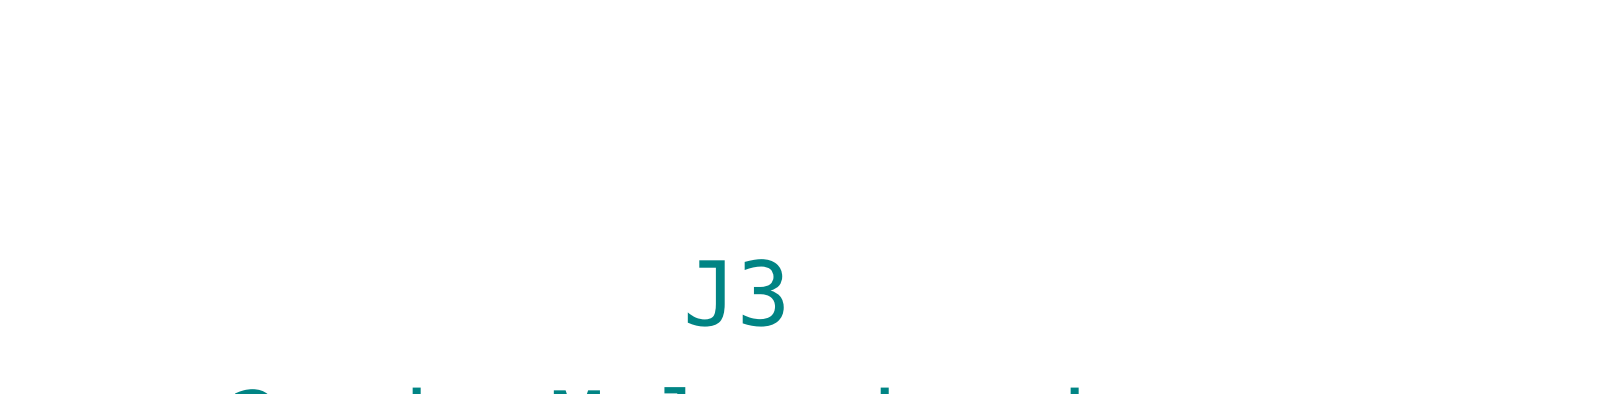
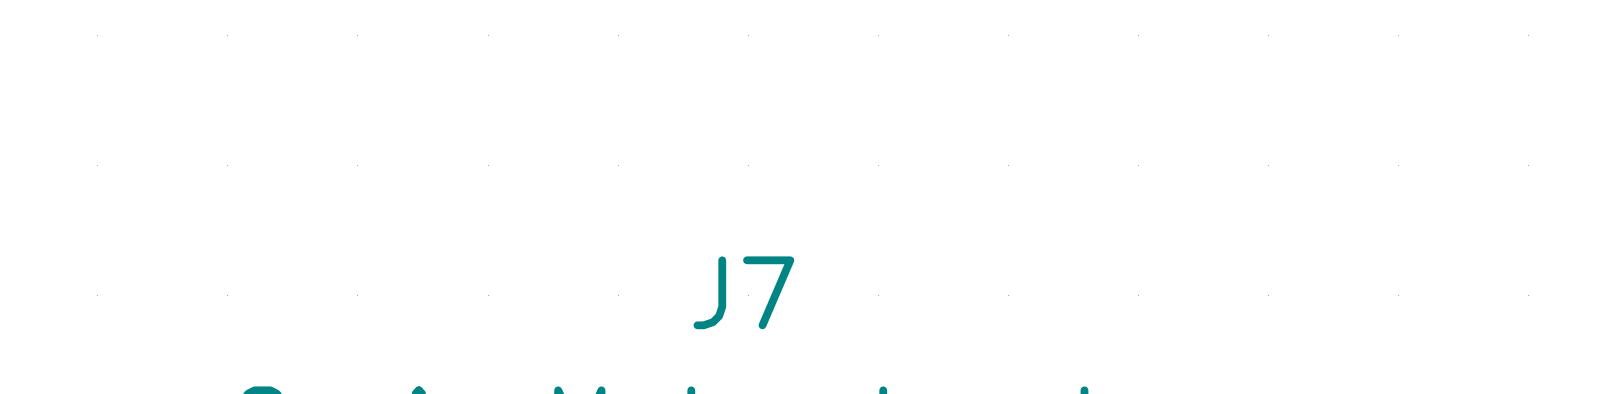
J3 name: J3 (735, 292) -> J7 (743, 292)

